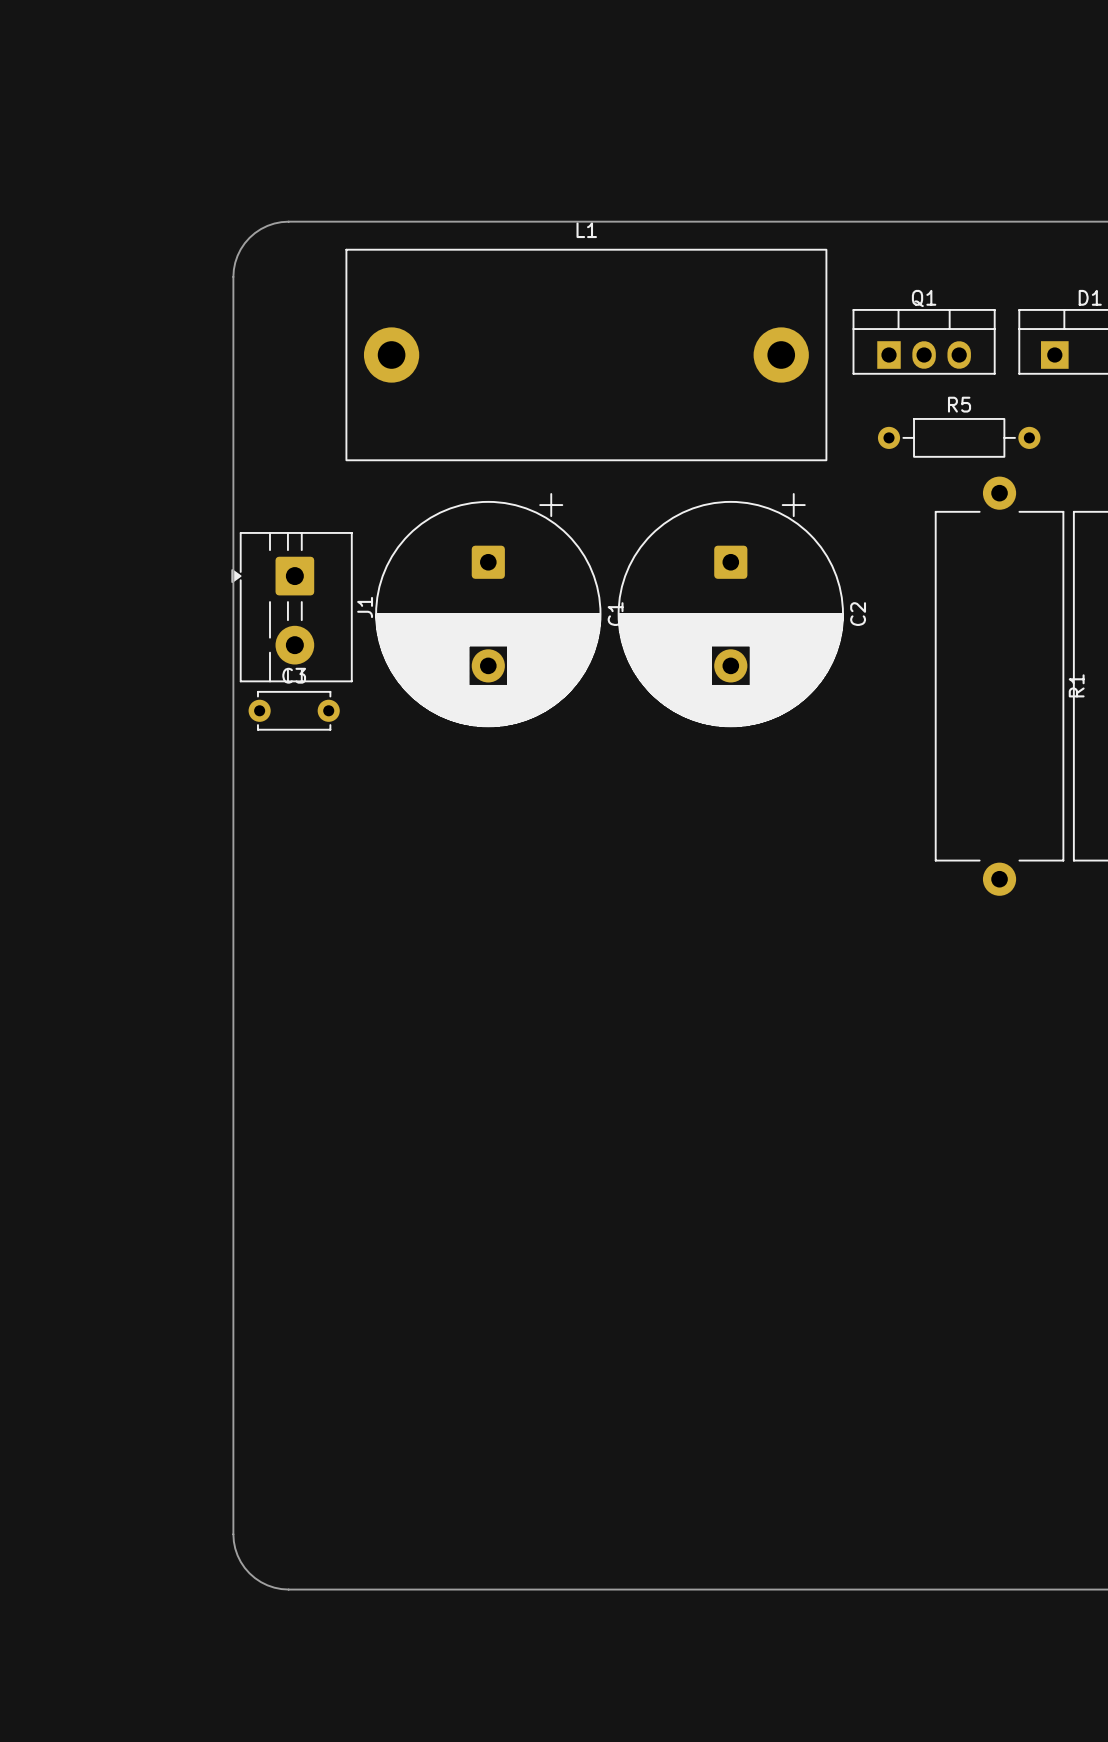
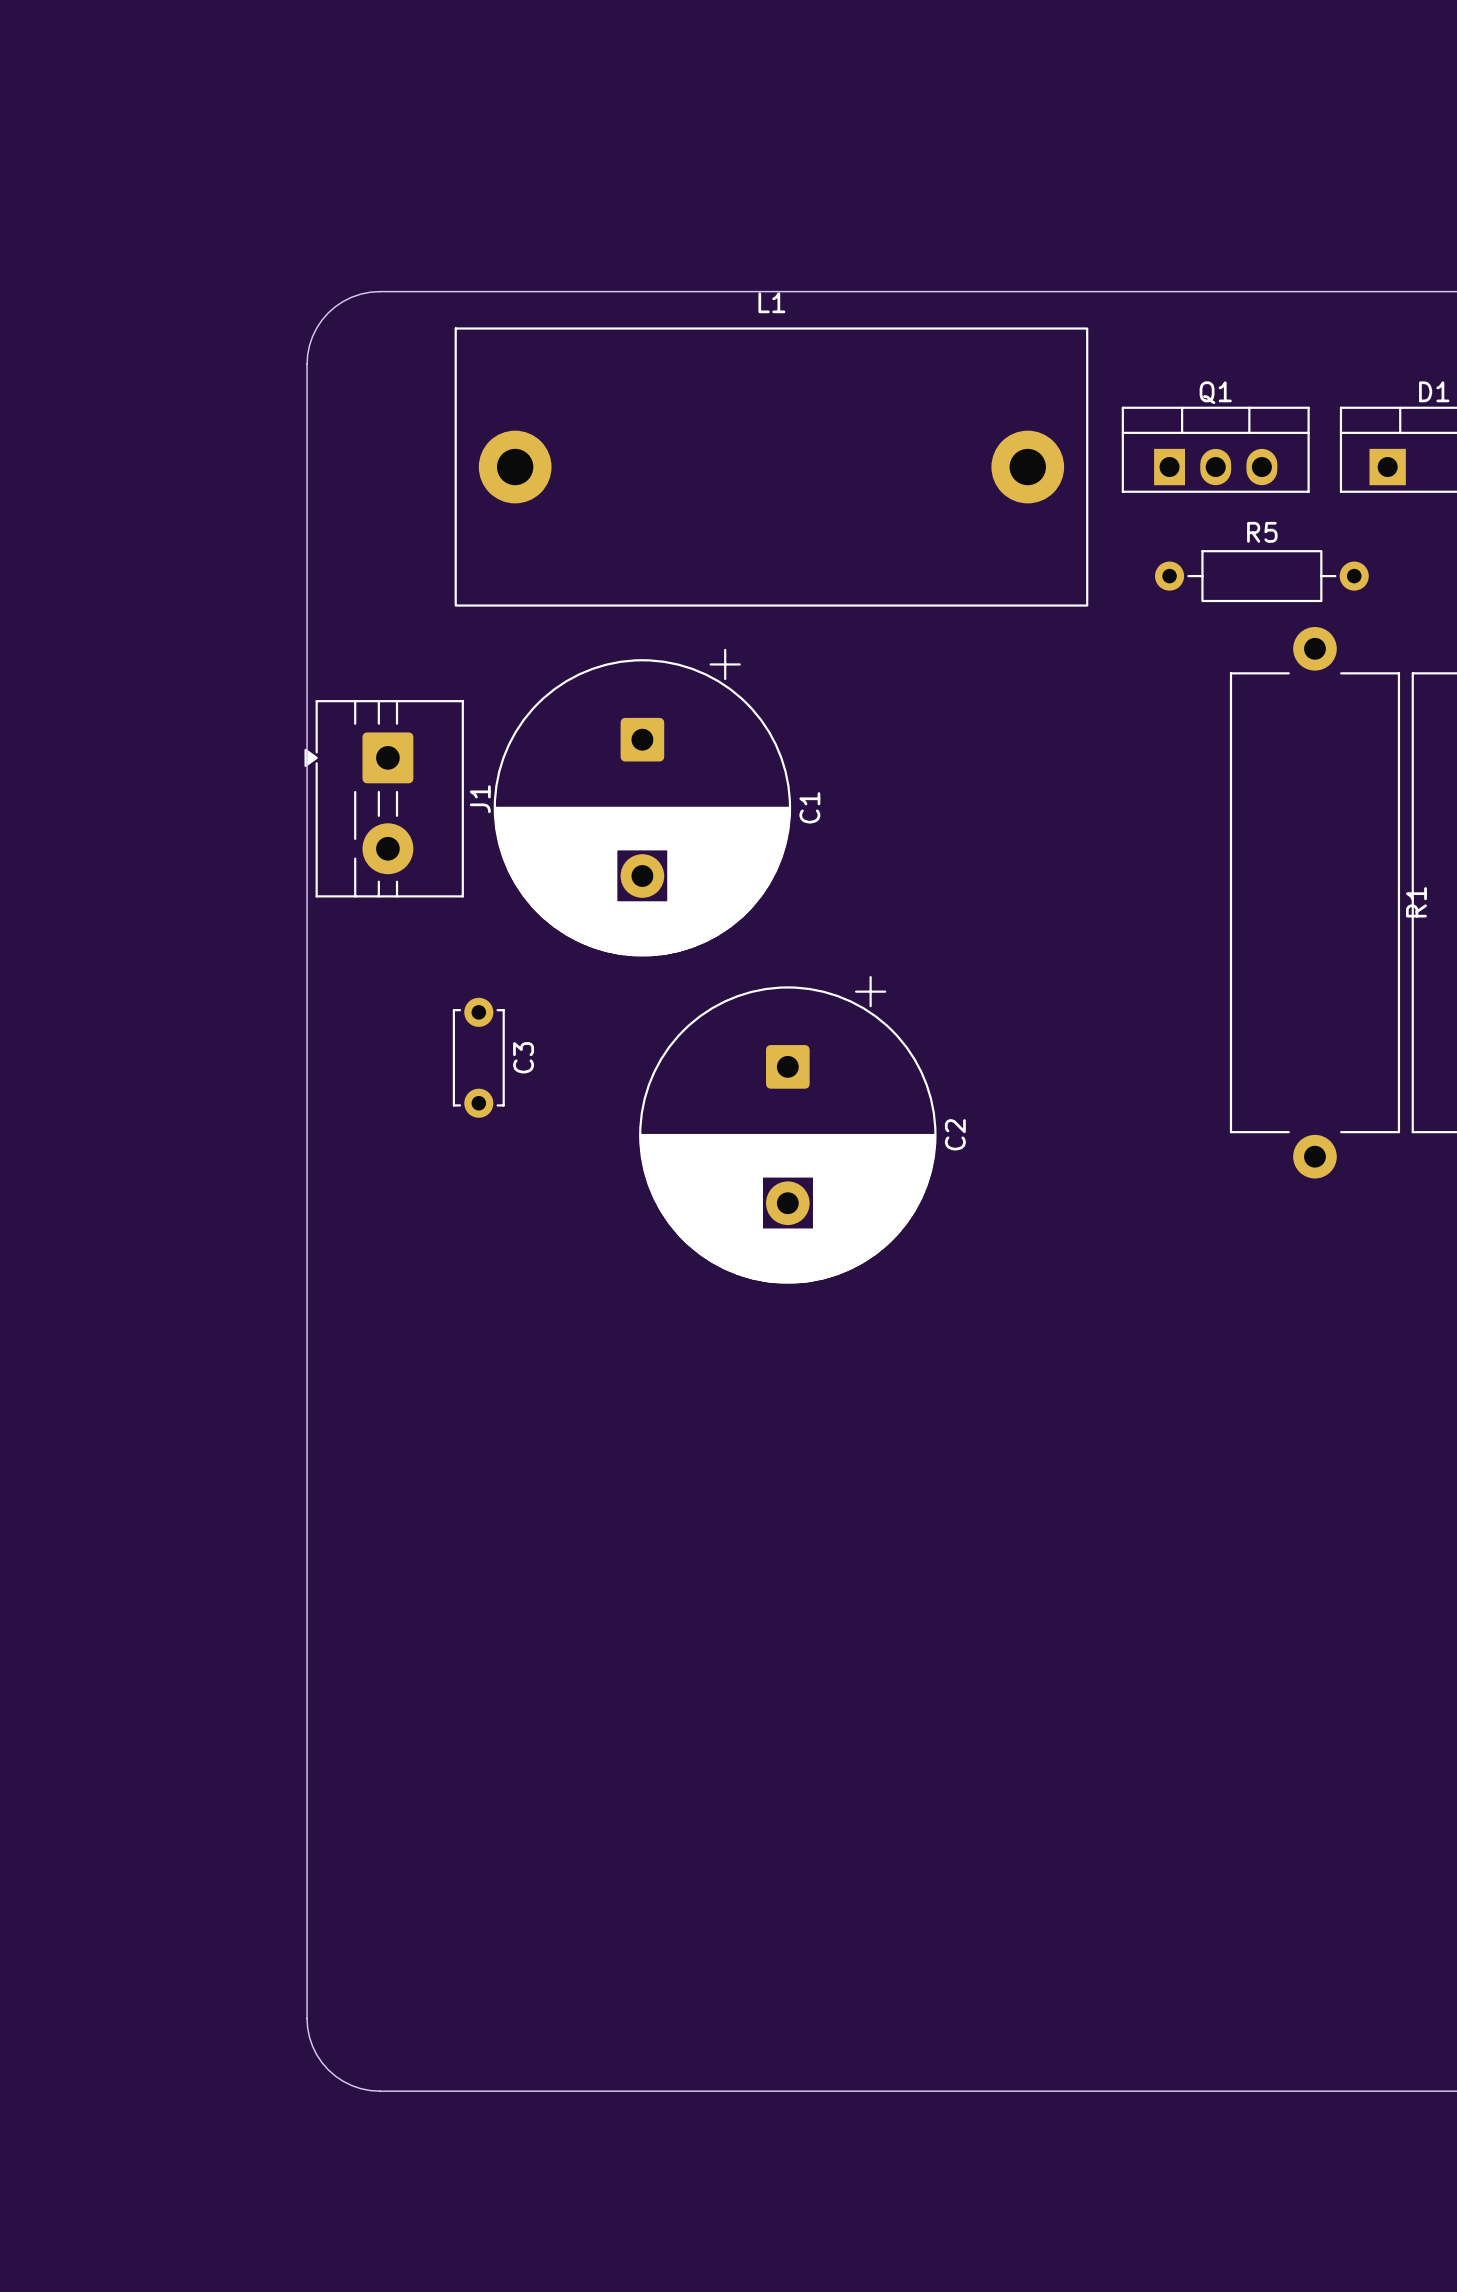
C2 position: (730, 610) -> (787, 1129)
C3 rotation: 0° (294, 710) -> 90° clockwise (478, 1057)
C3 position: (294, 710) -> (478, 1057)

